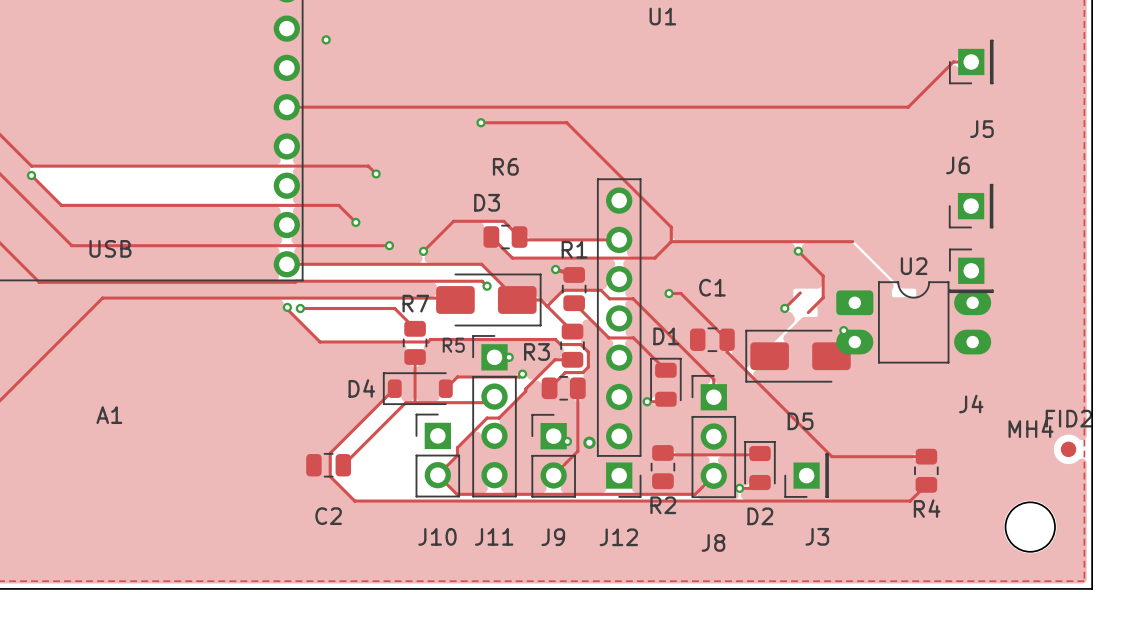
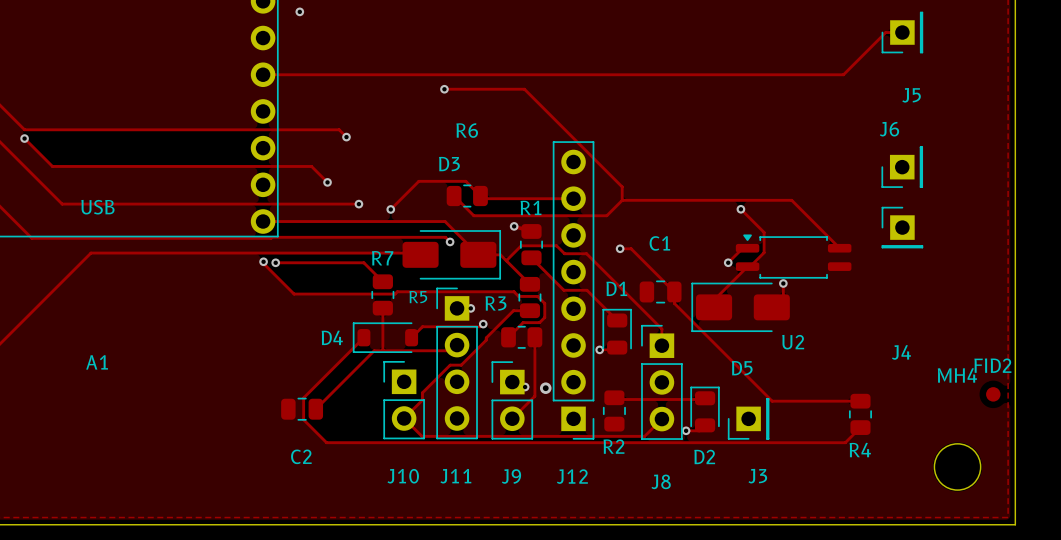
track: none -> (791, 200) (839, 248)
U2 name position: U2 (914, 266) -> U2 (793, 342)
U2 footprint: [836, 281, 992, 364] -> [735, 234, 852, 279]
track: none -> (750, 266) (747, 266) (714, 300)

